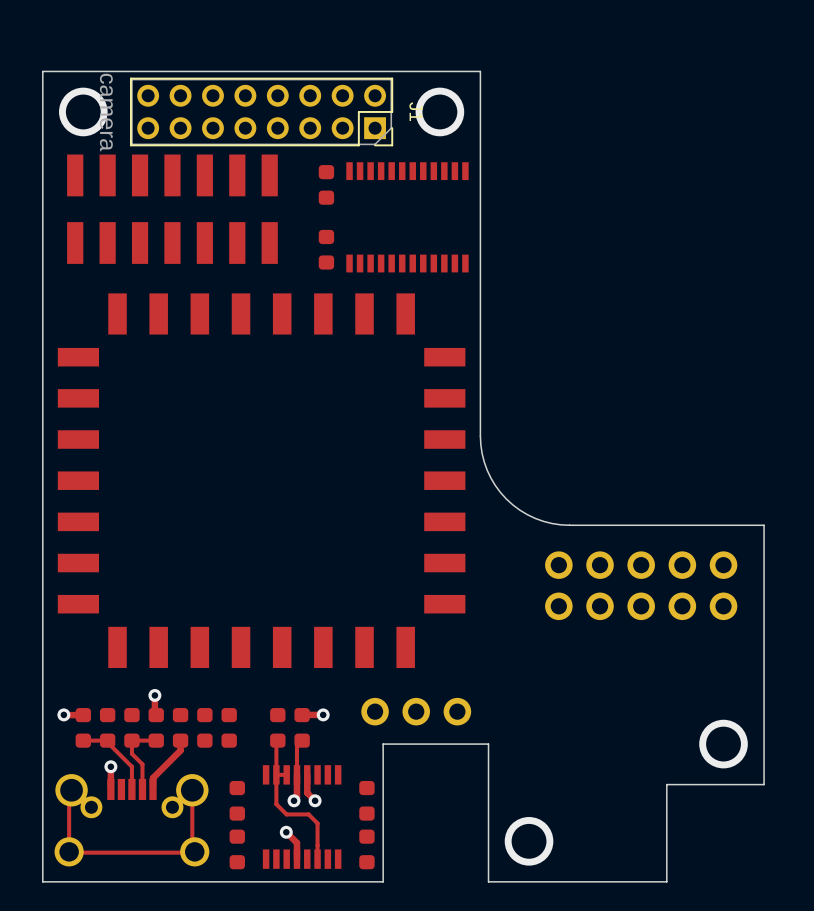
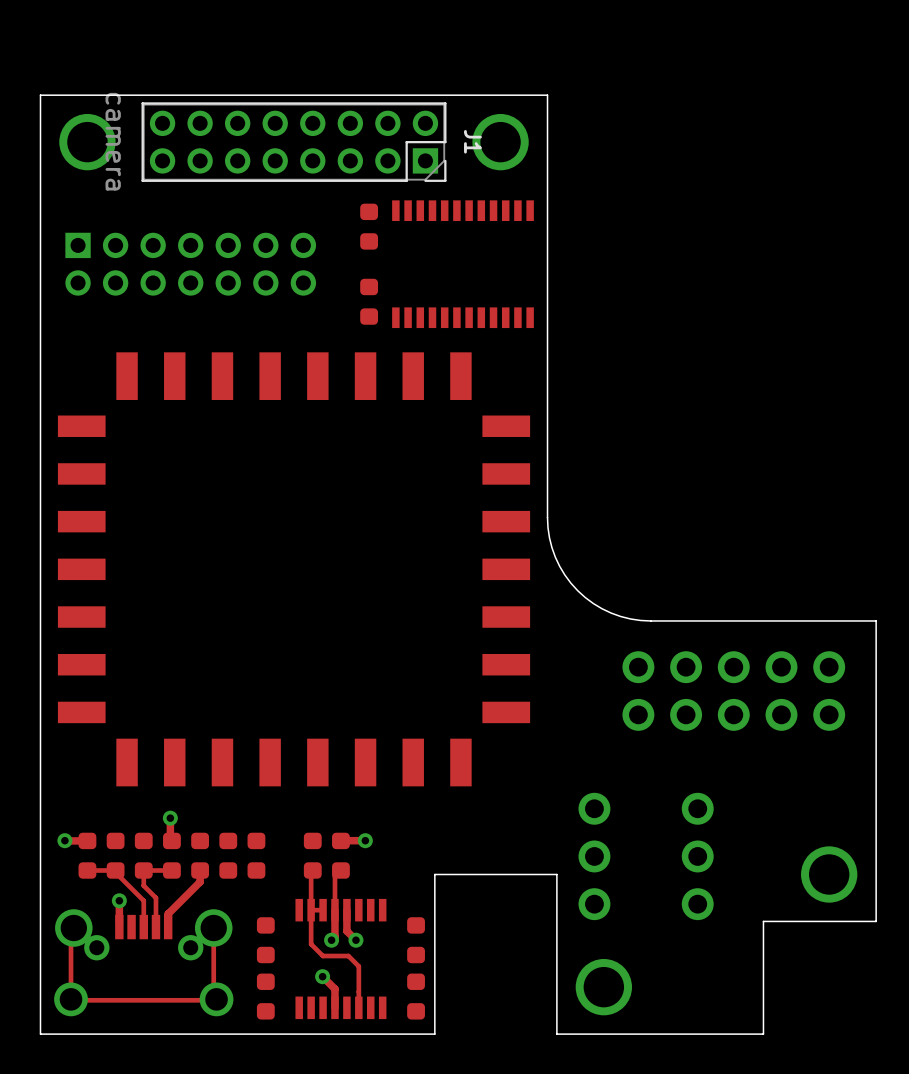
part footprint: [67, 154, 278, 264] -> [65, 232, 317, 296]
part: (416, 711) -> none
part: none -> (594, 856)
part: none -> (697, 856)

